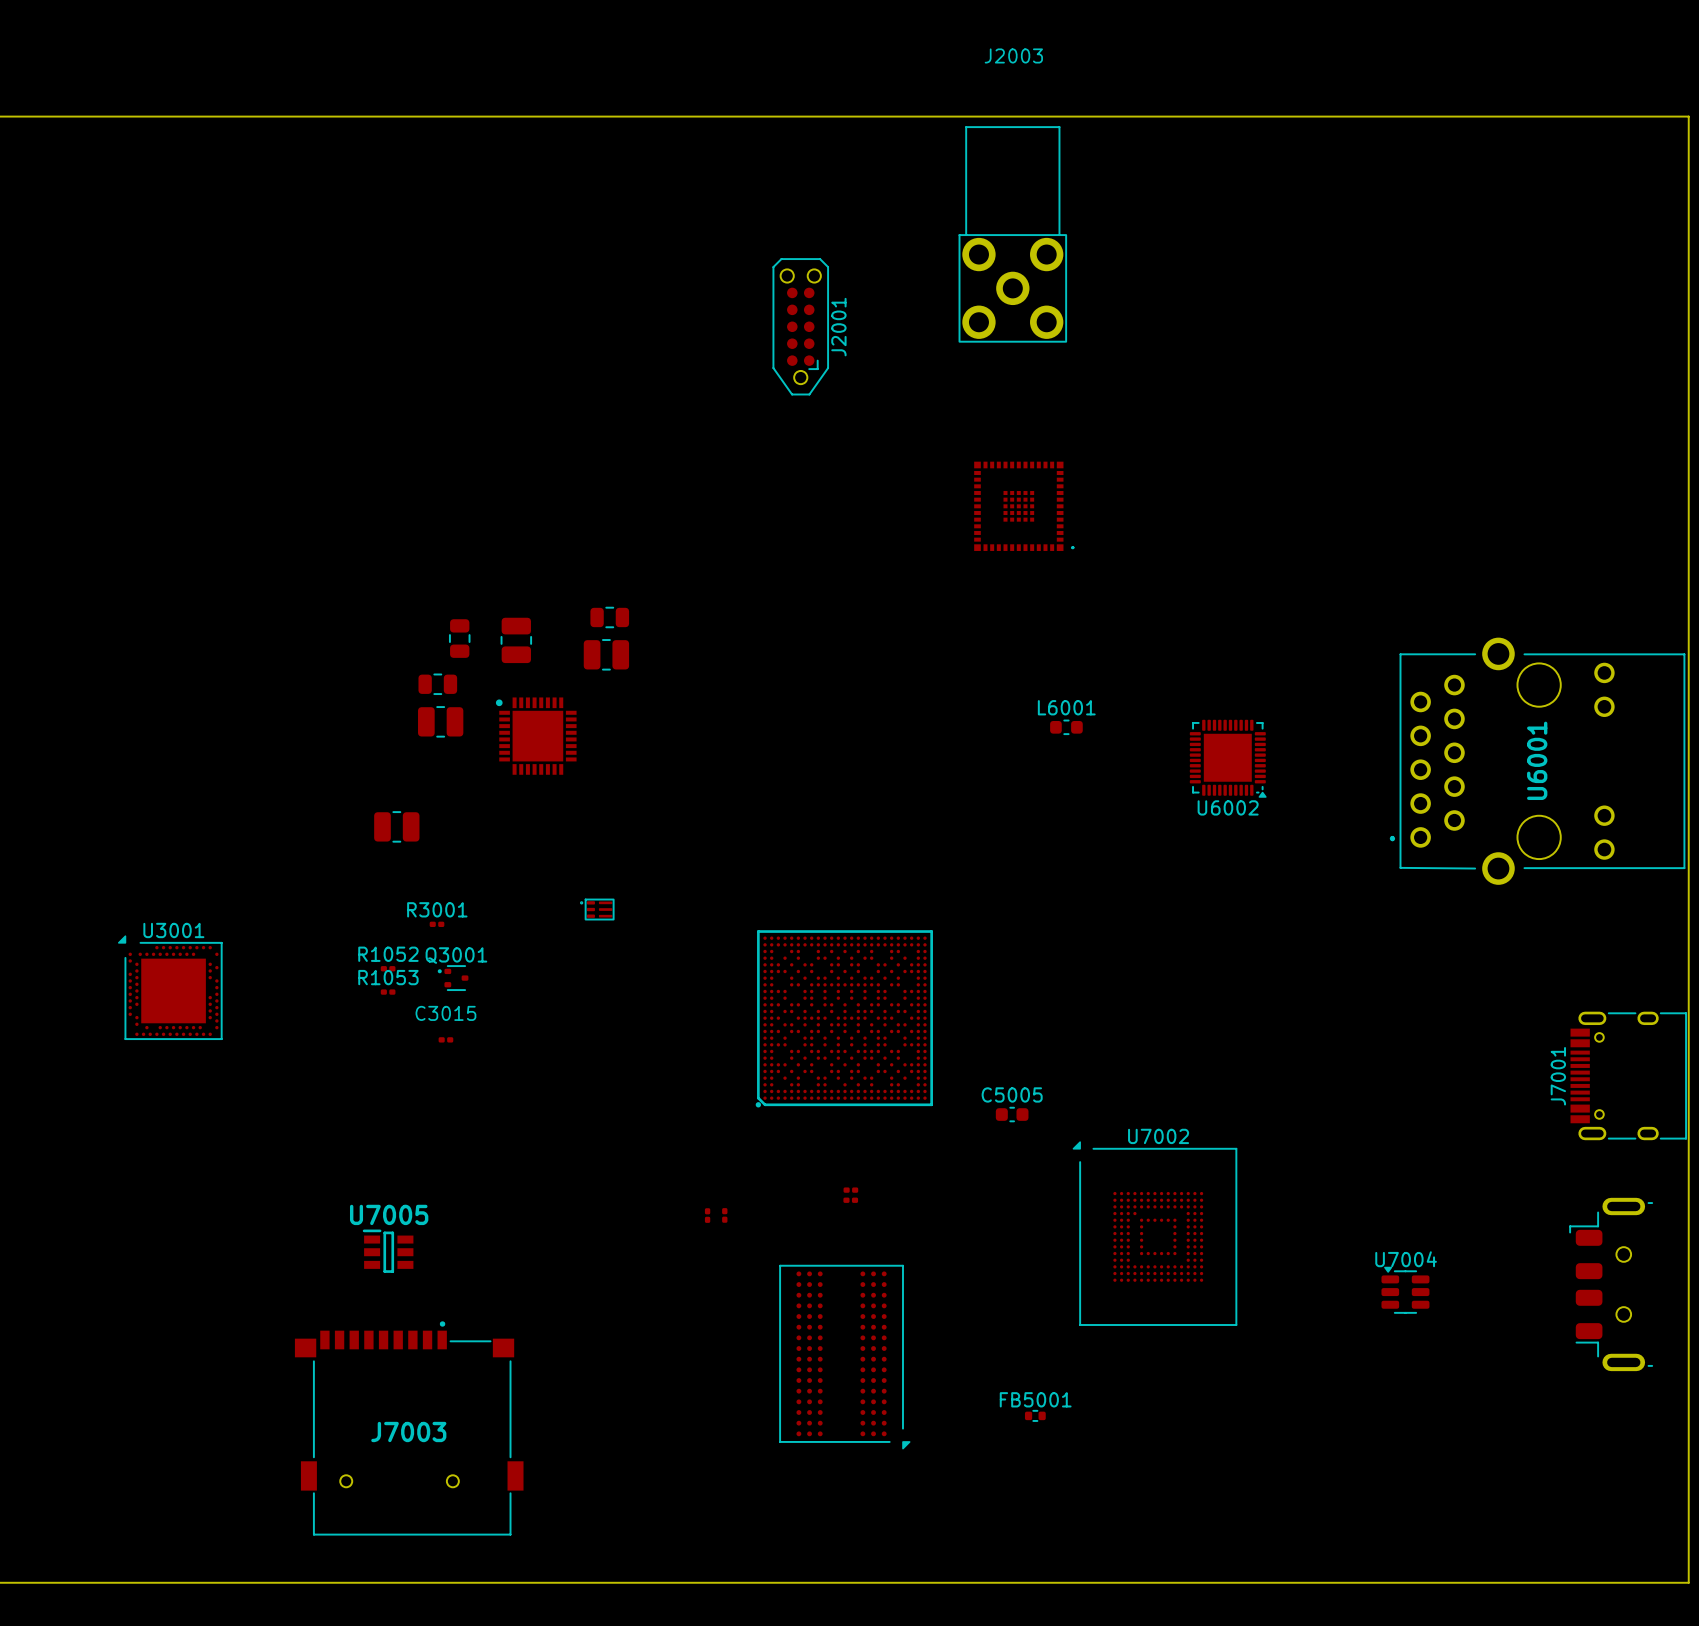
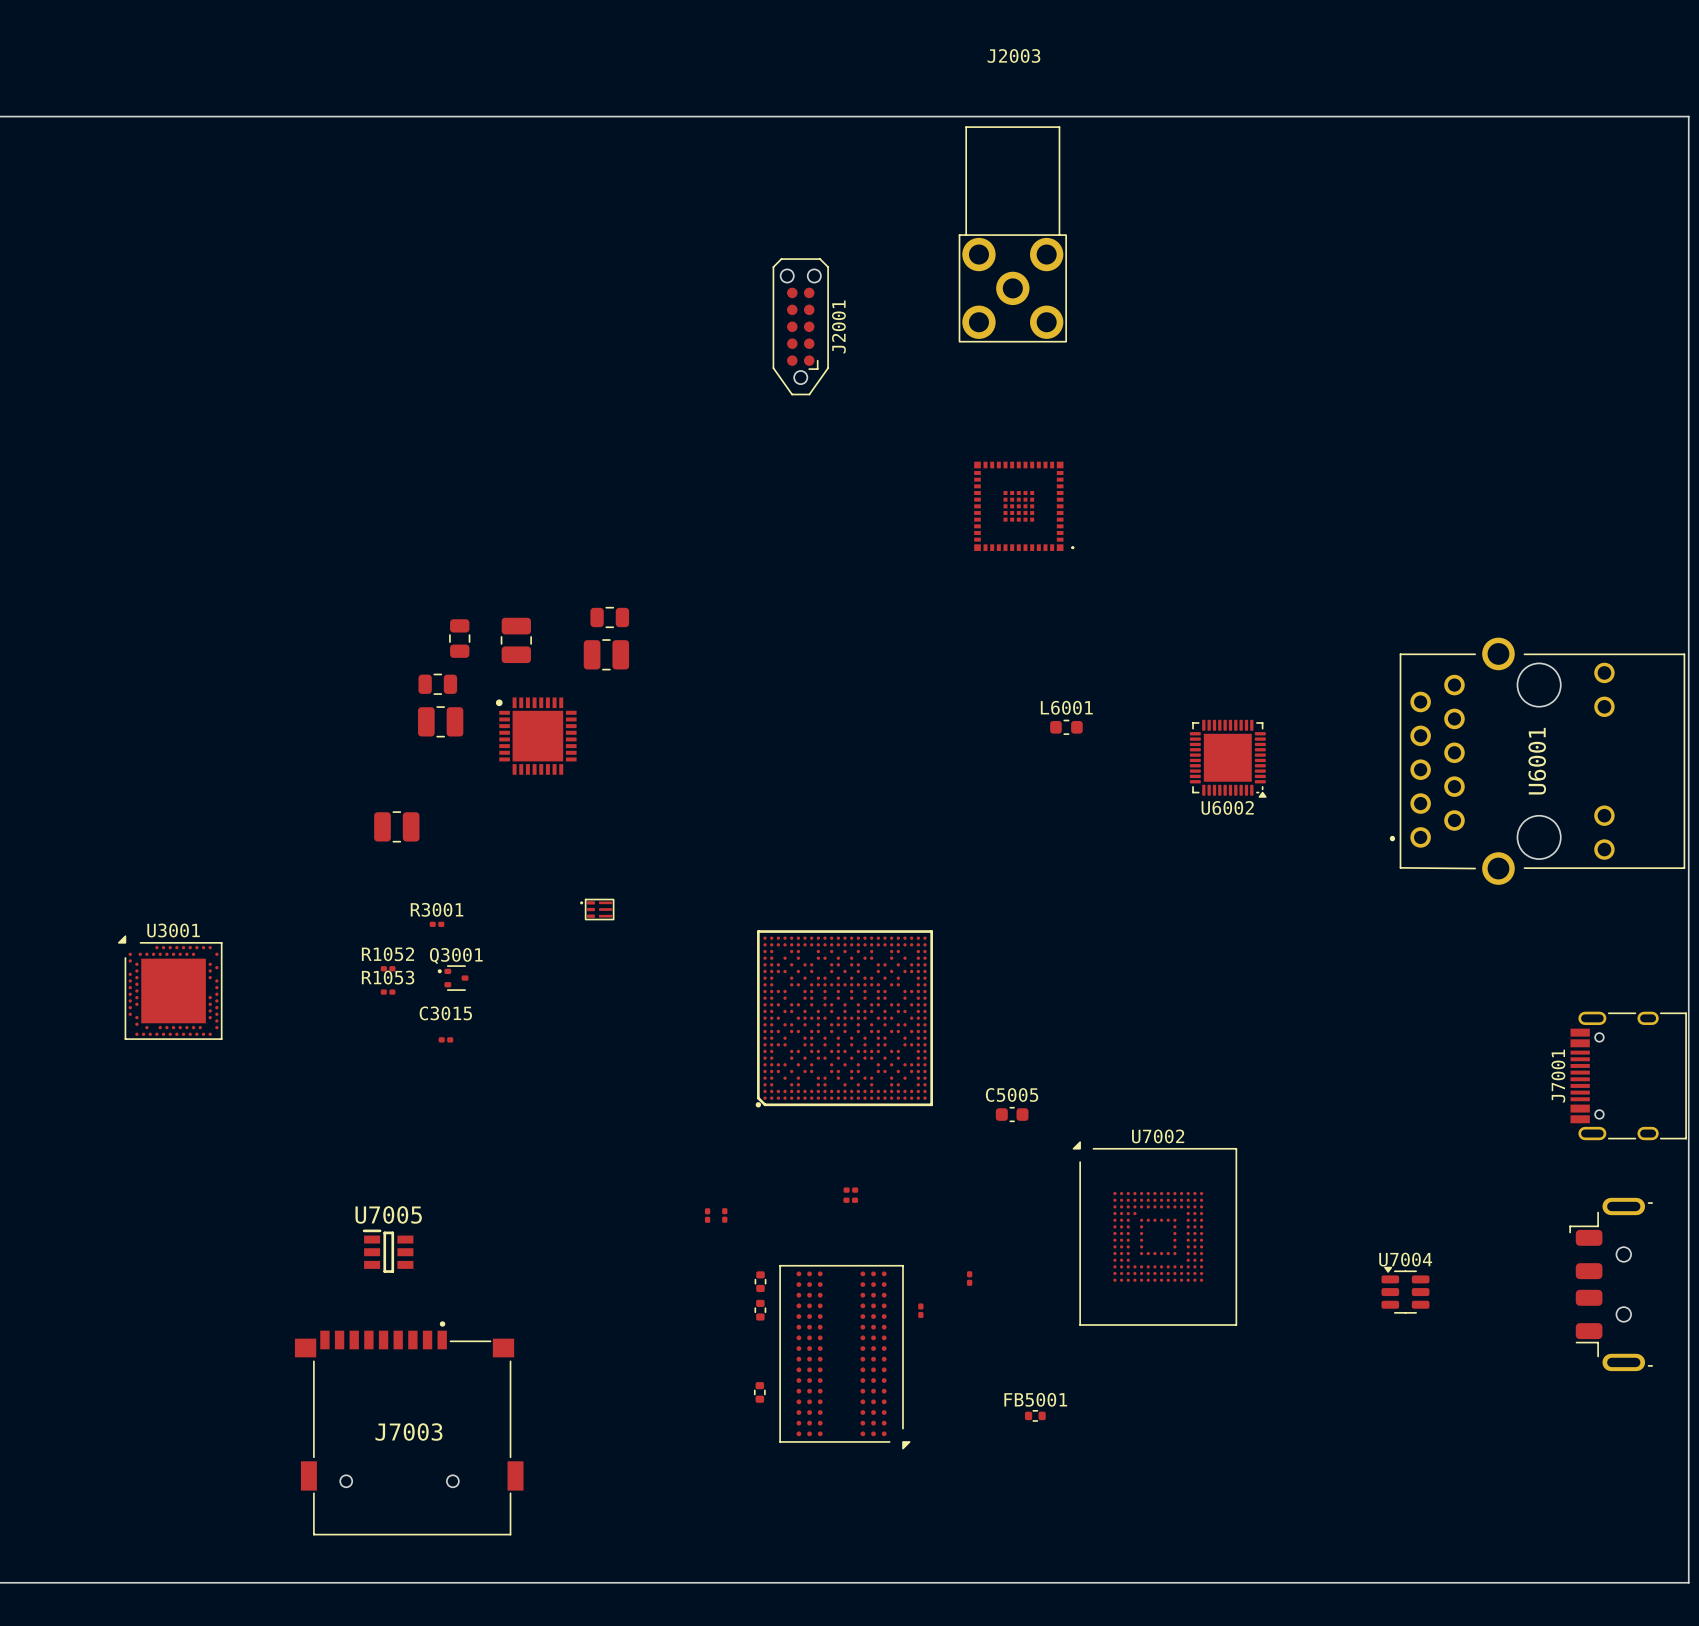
part: none -> (969, 1278)
part: none -> (760, 1281)
part: none -> (760, 1310)
part: none -> (920, 1310)
part: none -> (759, 1392)

